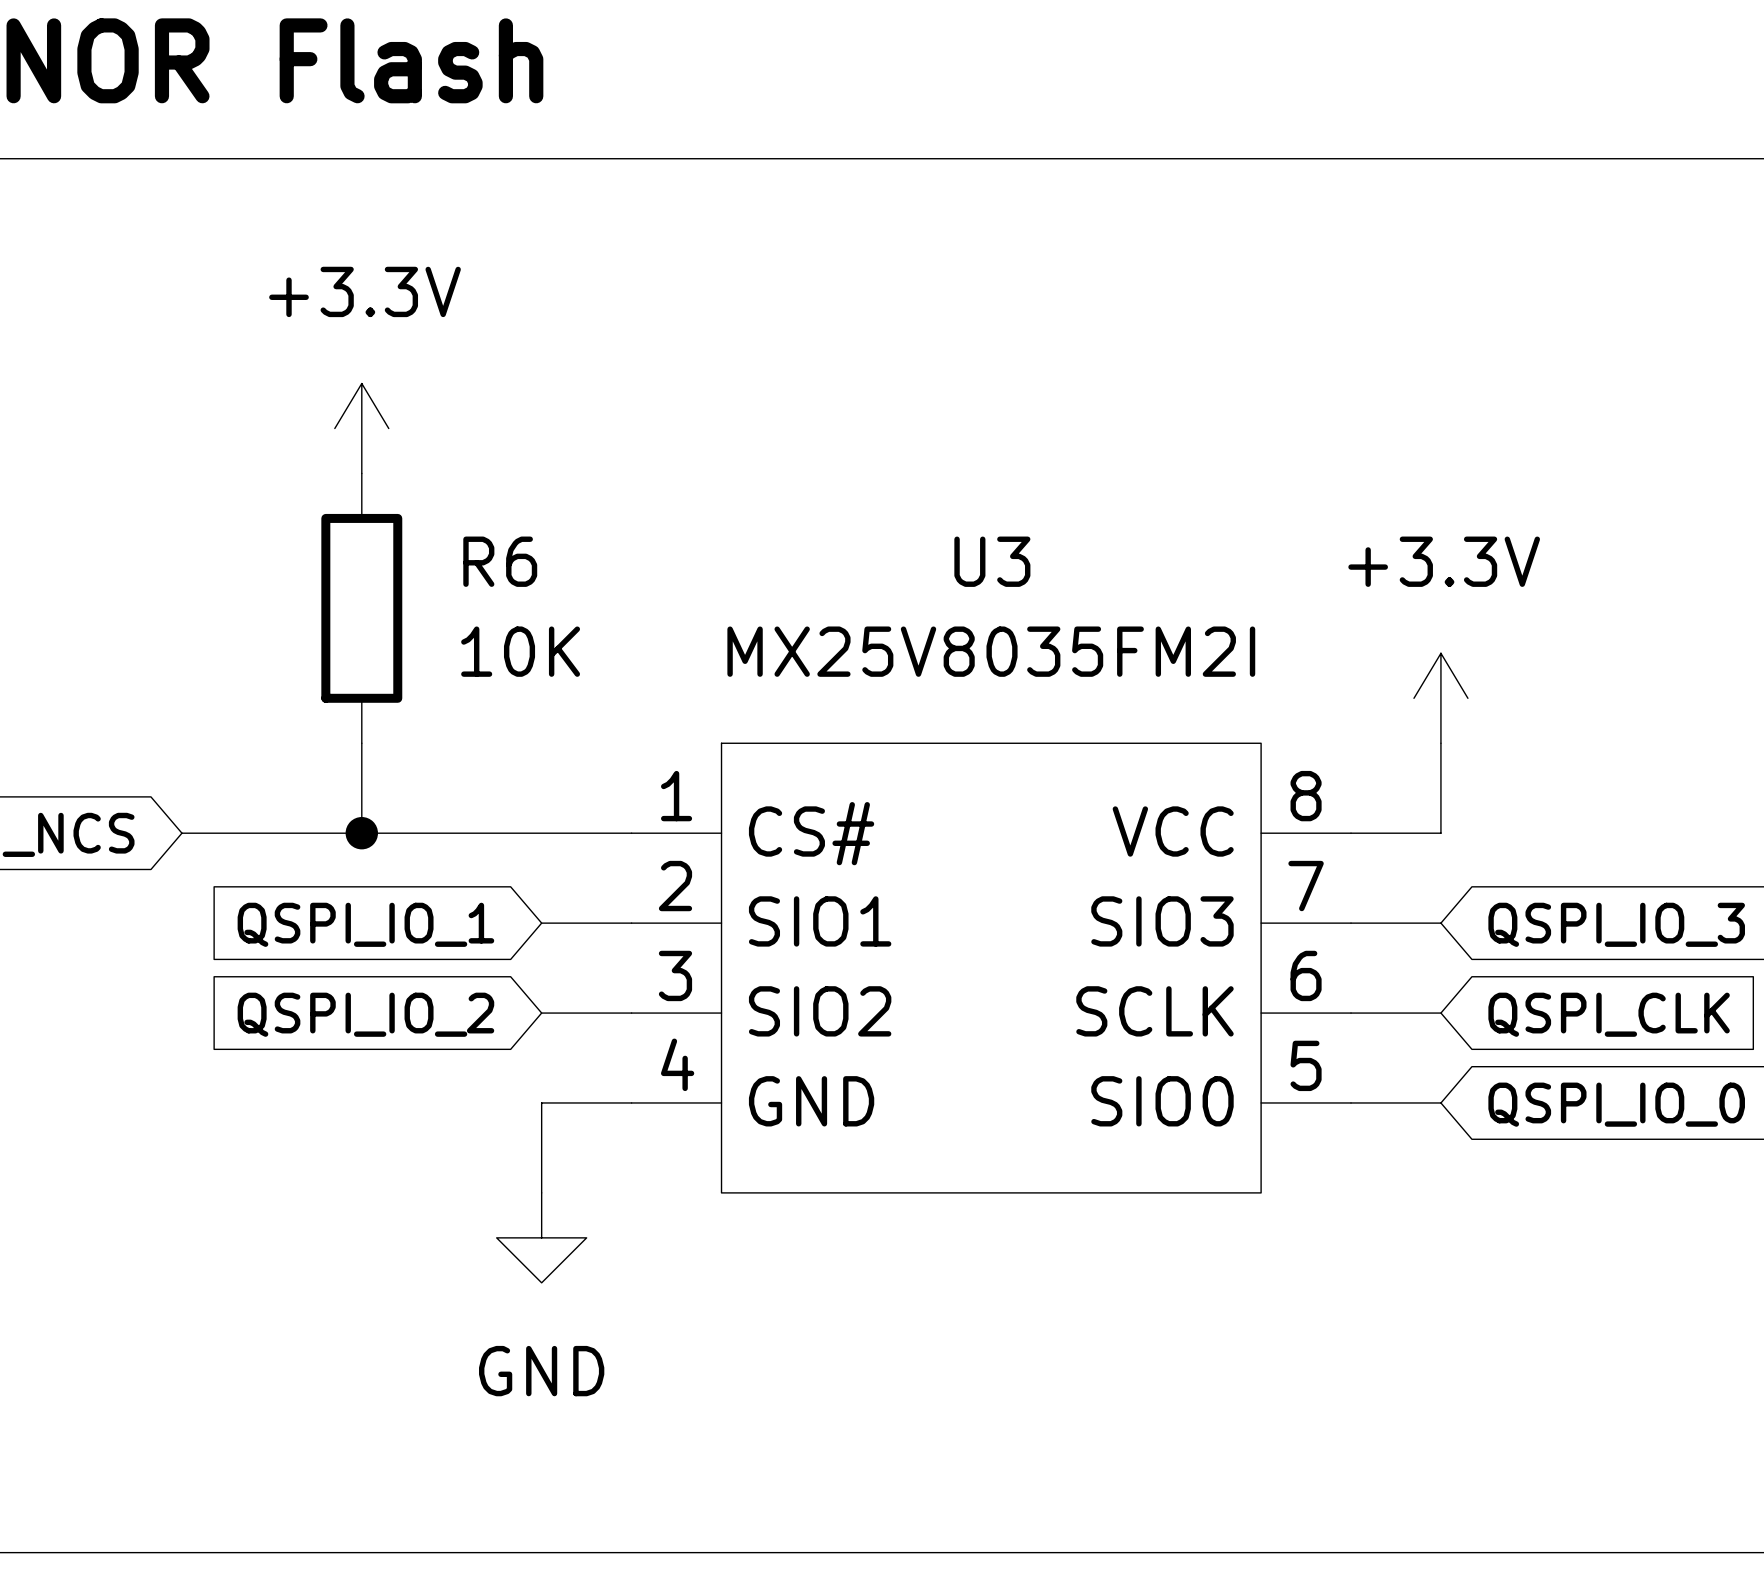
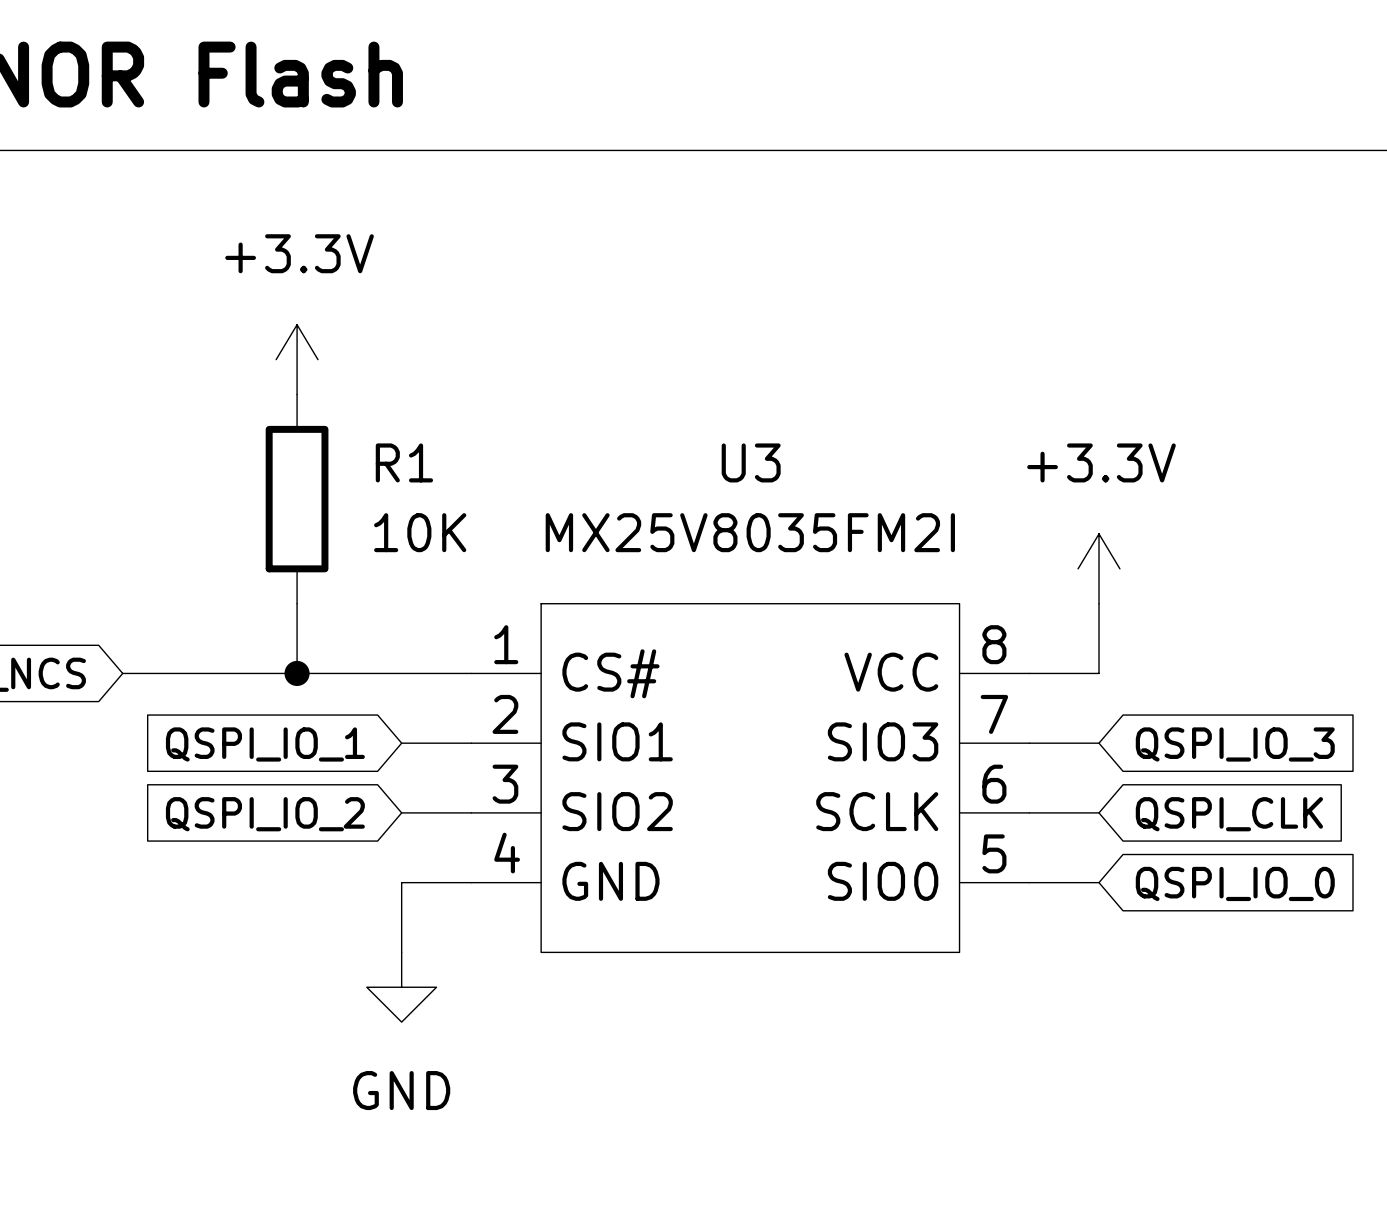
power symbol position: +3.3V (361, 428) -> +3.3V (297, 359)
R6: 10K (361, 608) -> none
R1: none -> 10K (297, 499)
wire: (361, 743) (361, 833) -> (297, 603) (297, 673)
junction position: (361, 833) -> (297, 673)

